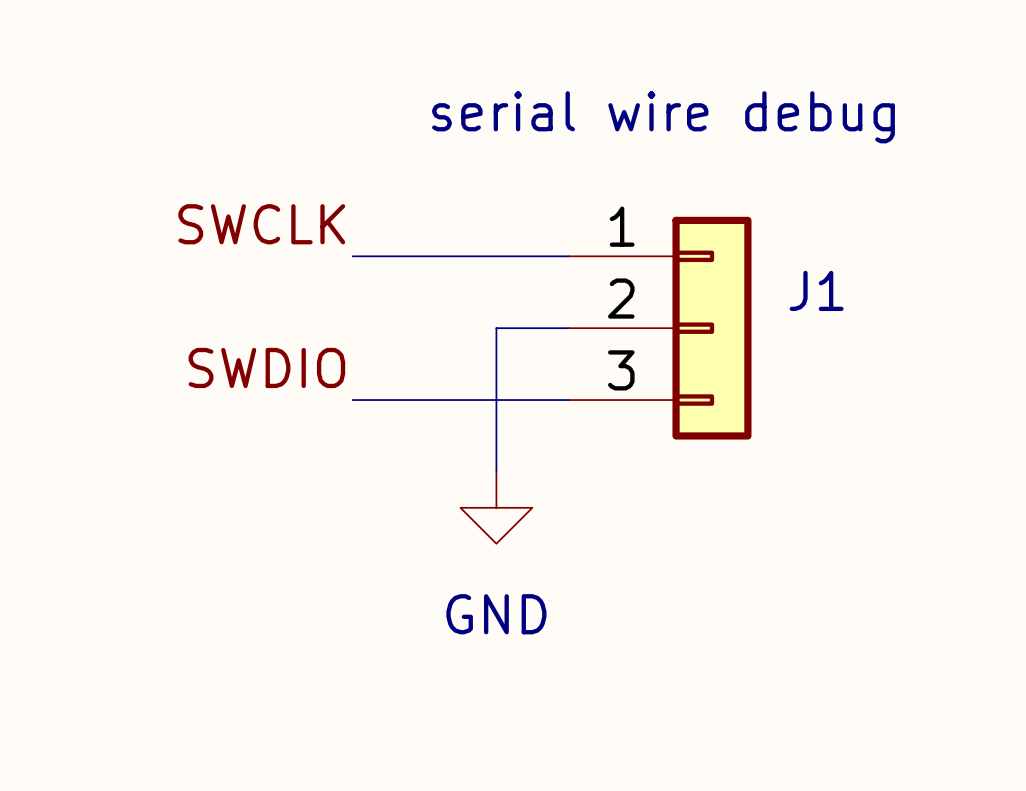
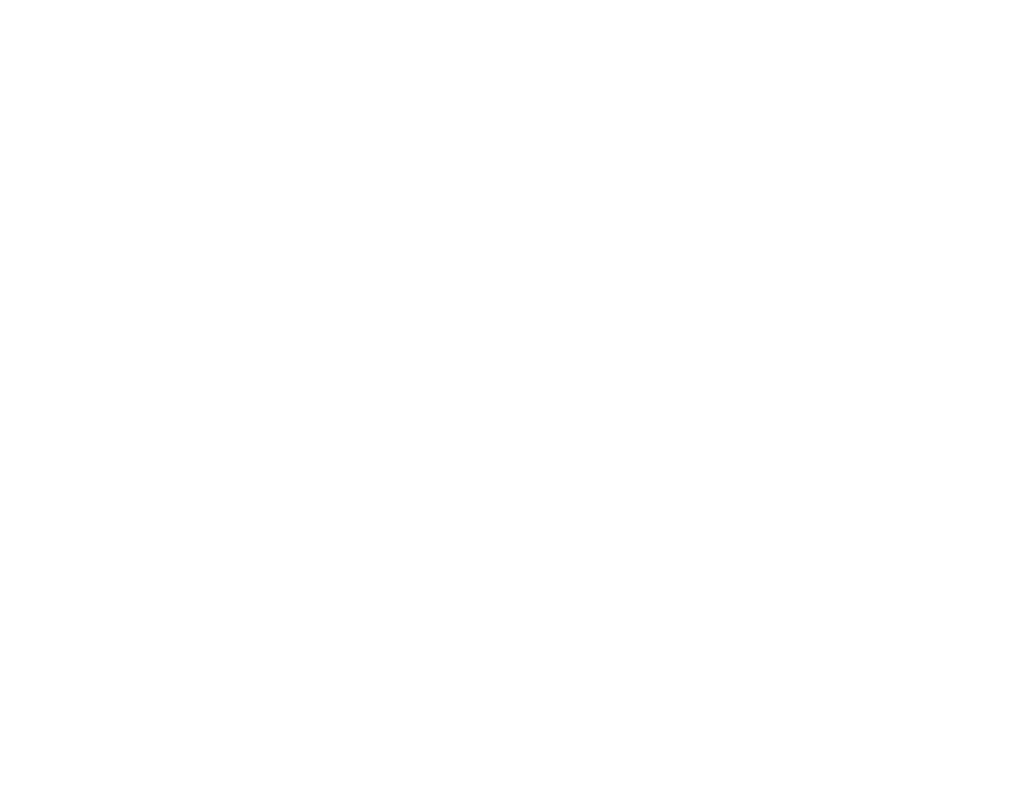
label: SWCLK (261, 224) -> none
wire: (352, 256) (568, 256) -> none
wire: (568, 328) (496, 328) (496, 471) -> none
J1: serial wire debug (659, 328) -> none
label: SWDIO (266, 367) -> none
wire: (352, 400) (568, 400) -> none
power symbol: GND (496, 507) -> none

